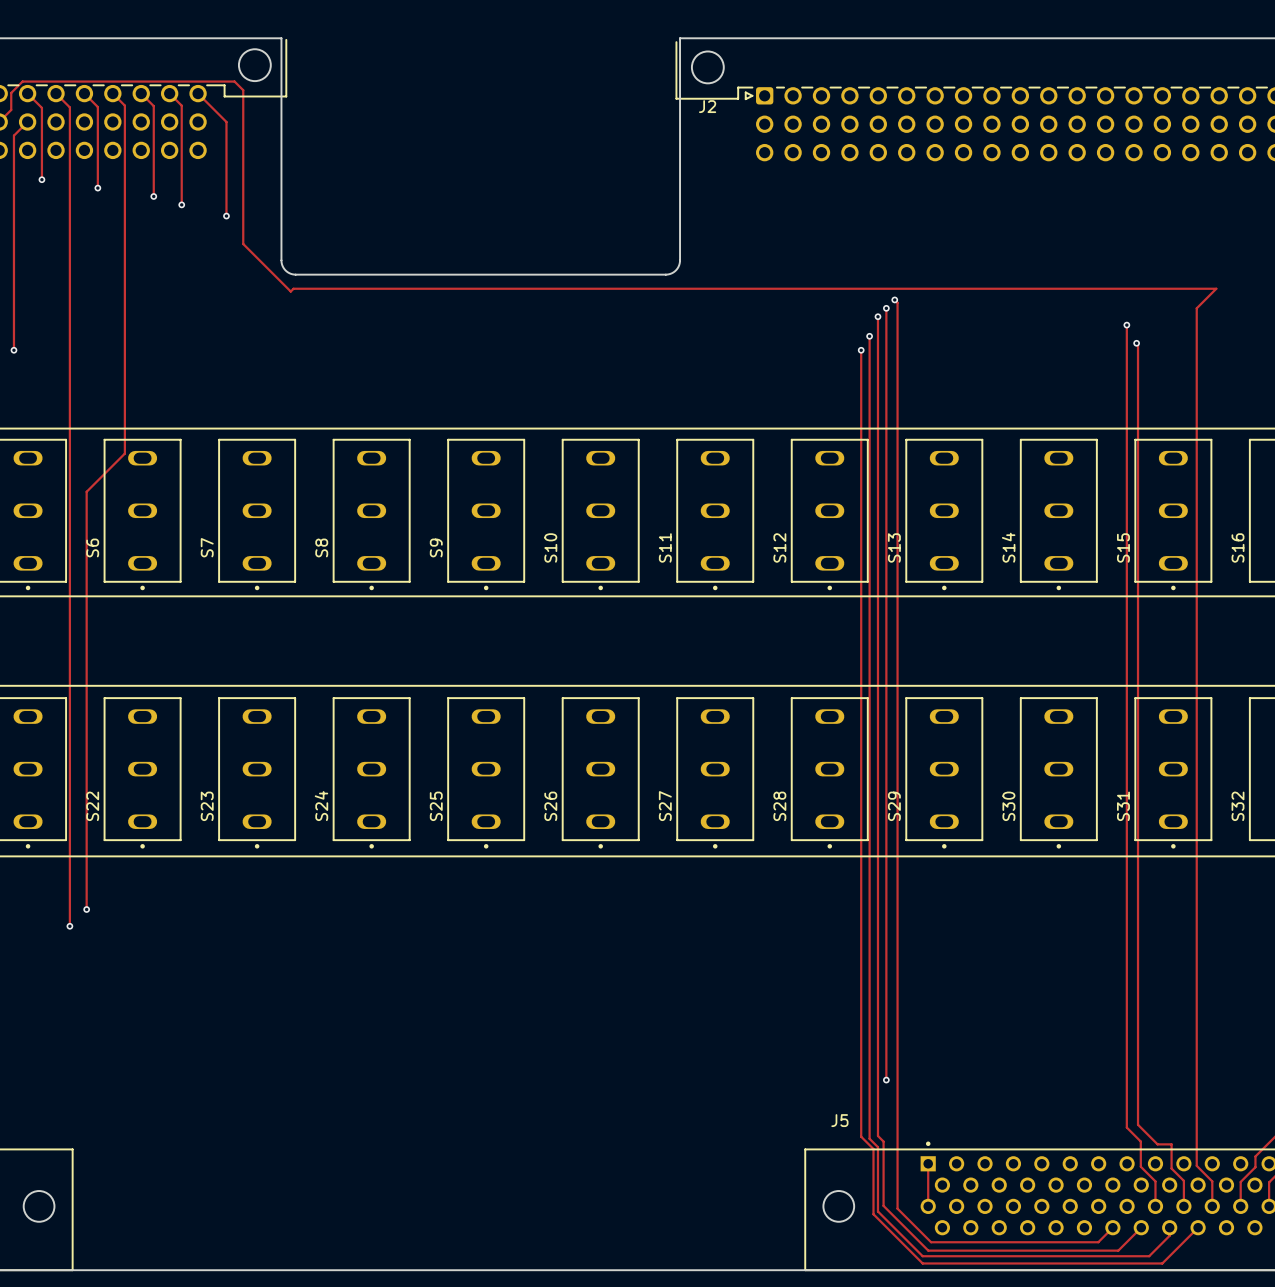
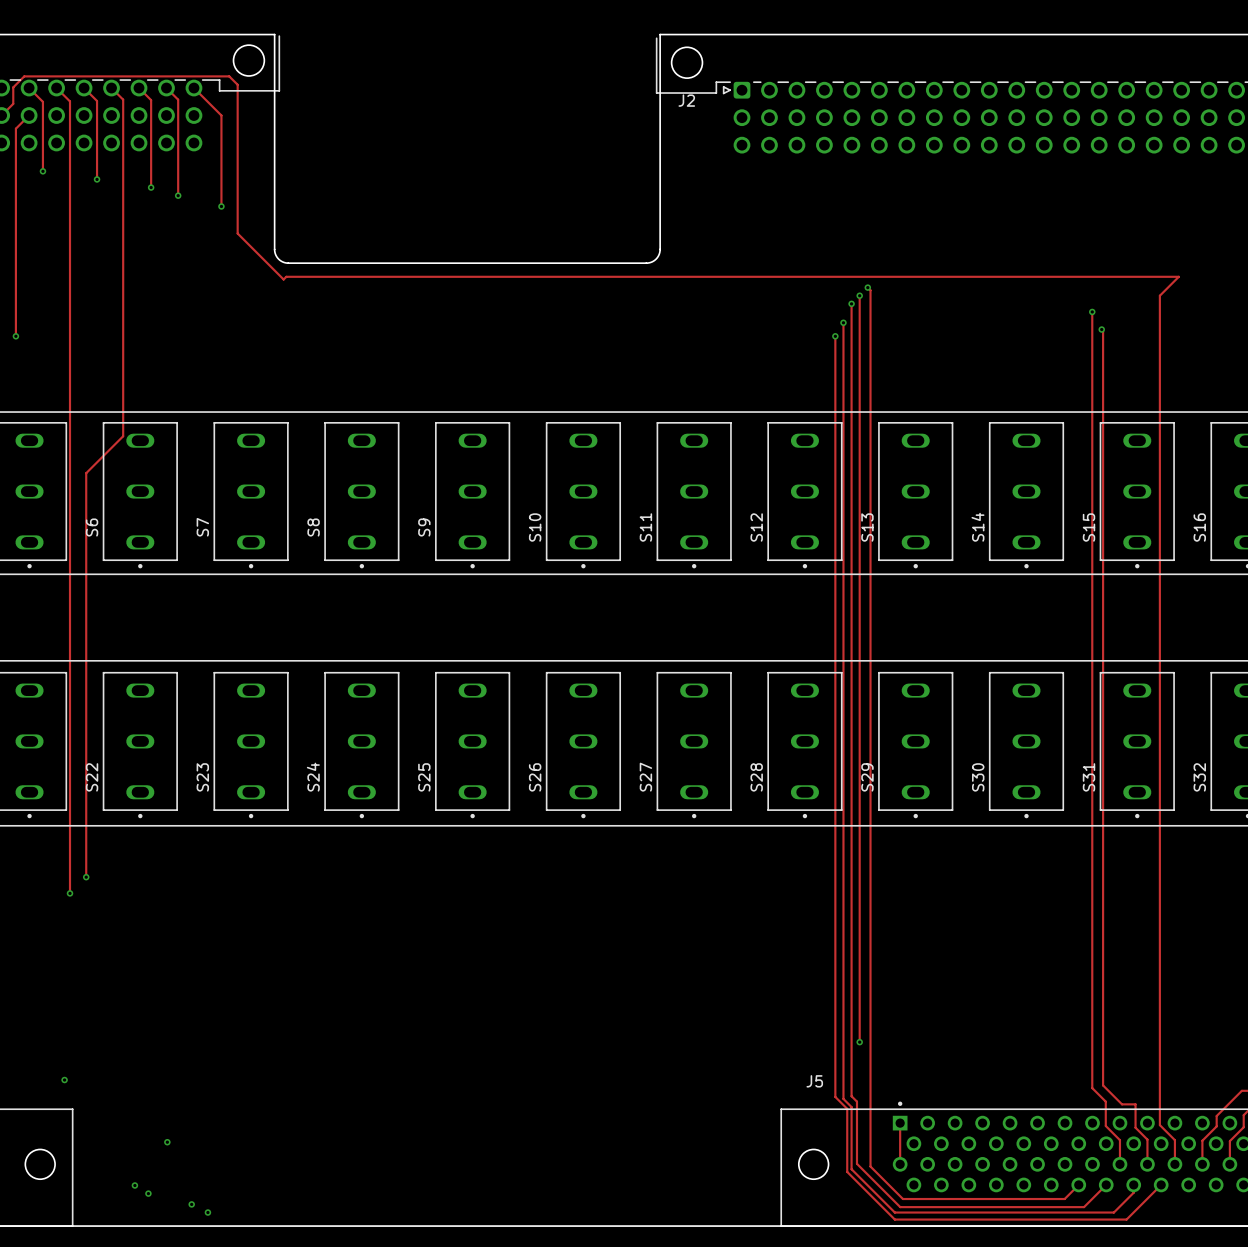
via: none -> (64, 1080)
via: none -> (167, 1142)
via: none -> (134, 1185)
via: none -> (148, 1193)
via: none -> (191, 1204)
via: none -> (207, 1212)

